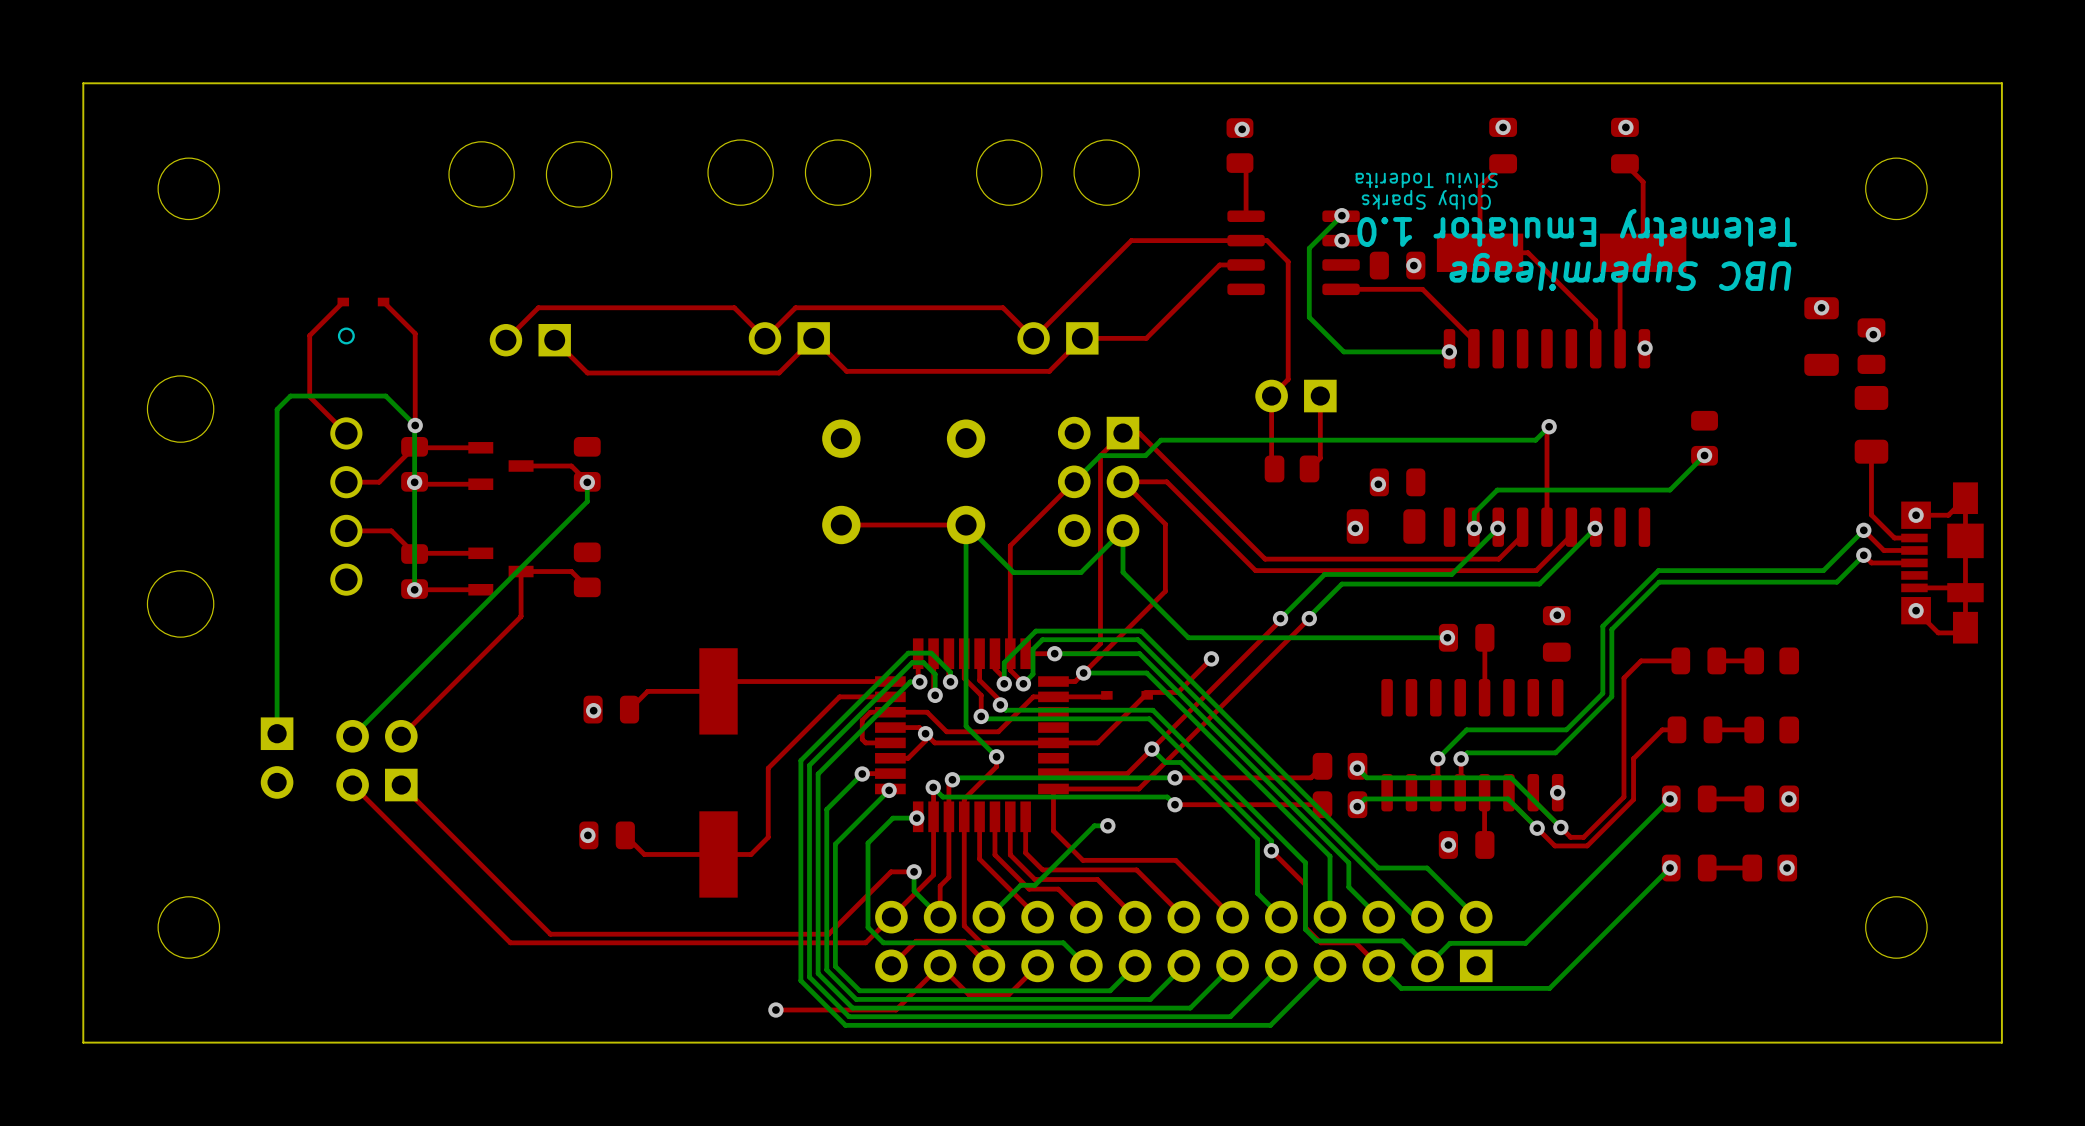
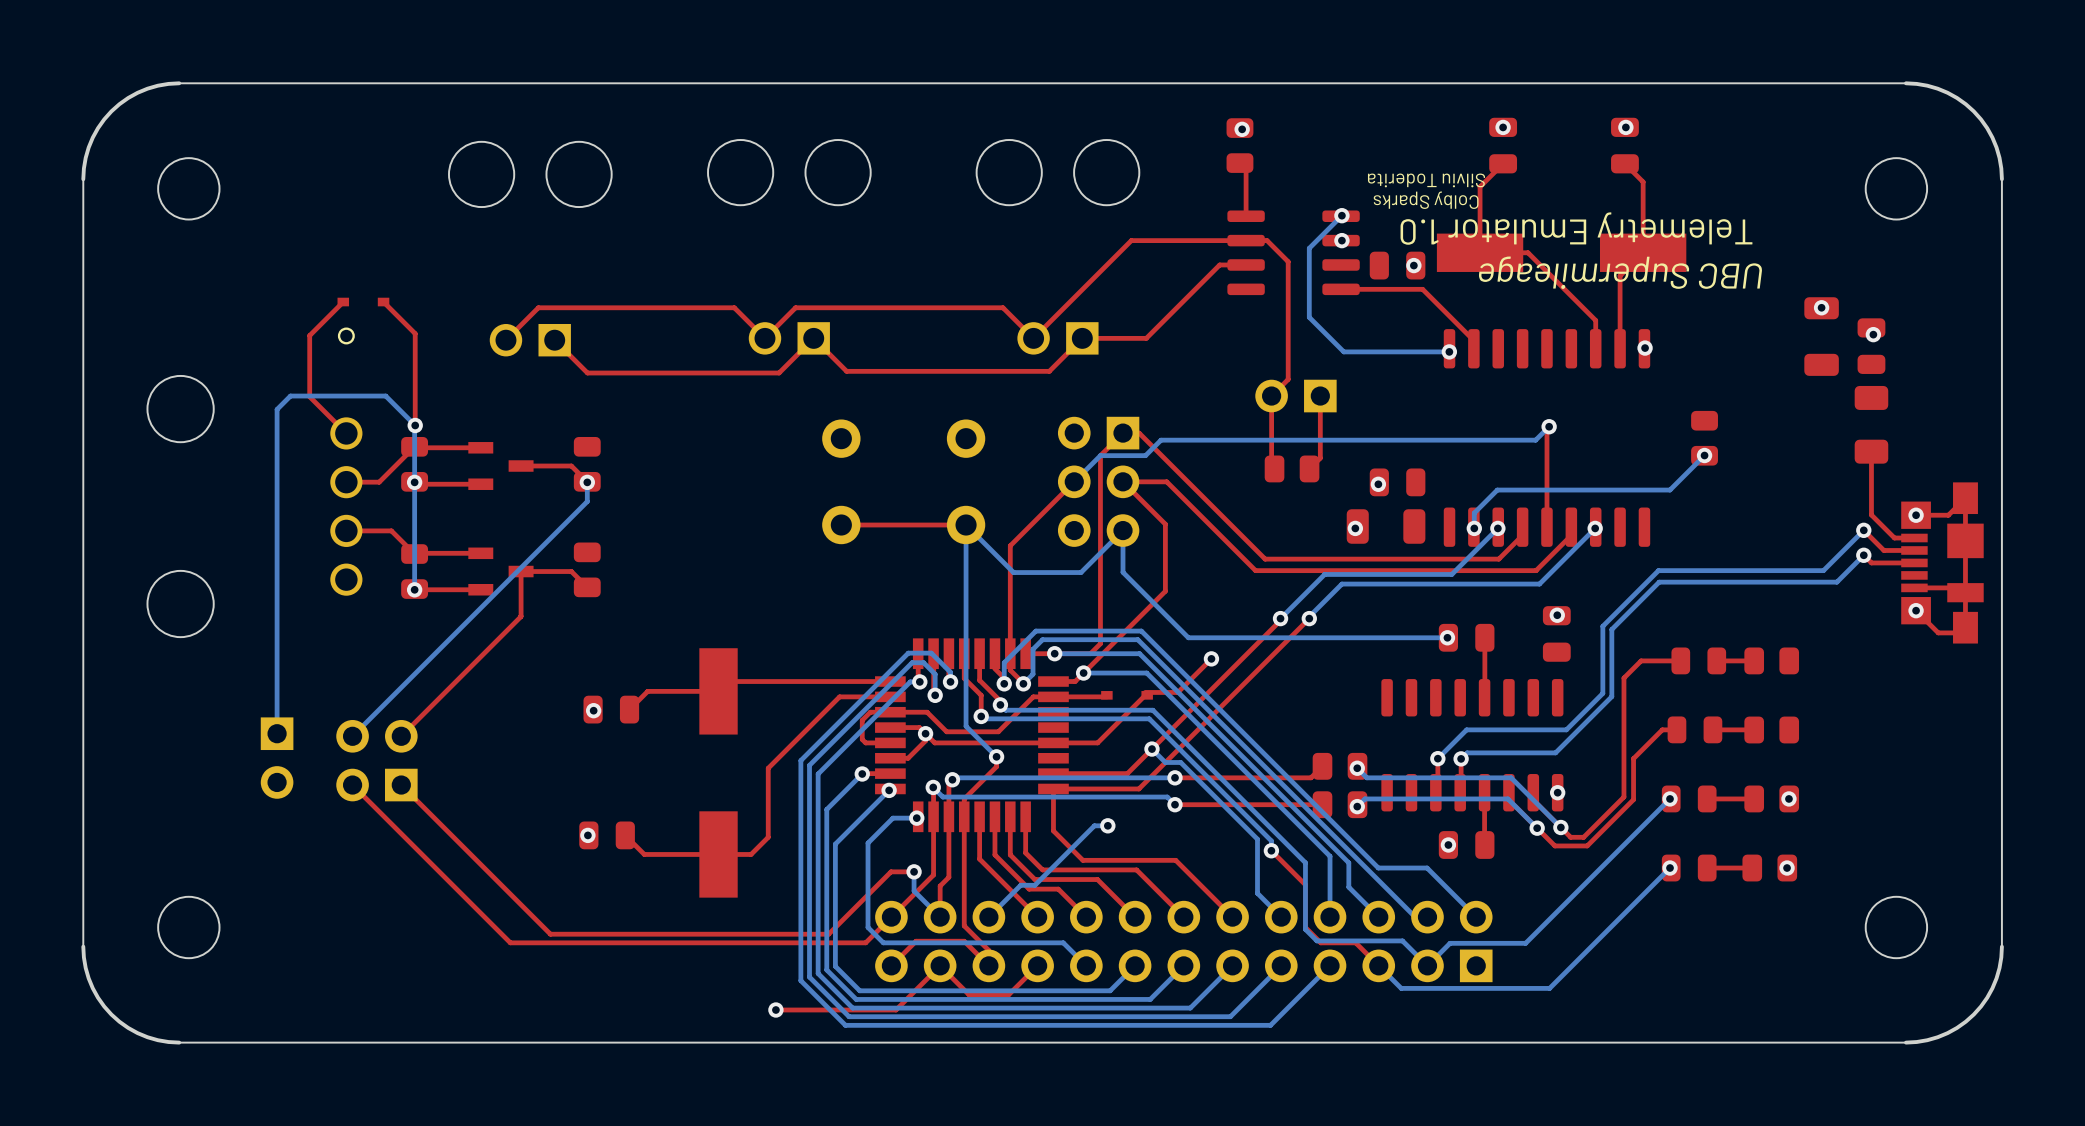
board edge: (179, 83) (83, 83) (83, 179) -> (179, 83) (157, 85) (137, 92) (111, 111) (92, 137) (85, 157) (83, 179)
board edge: (1906, 83) (2001, 83) (2001, 179) -> (1906, 83) (1937, 88) (1957, 98) (1973, 111) (1987, 128) (1996, 147) (2001, 179)
board edge: (83, 946) (83, 1042) (179, 1042) -> (83, 946) (88, 978) (98, 997) (111, 1014) (128, 1027) (147, 1037) (179, 1042)
board edge: (2001, 946) (2001, 1042) (1906, 1042) -> (2001, 946) (1999, 968) (1992, 988) (1973, 1014) (1947, 1033) (1927, 1040) (1906, 1042)

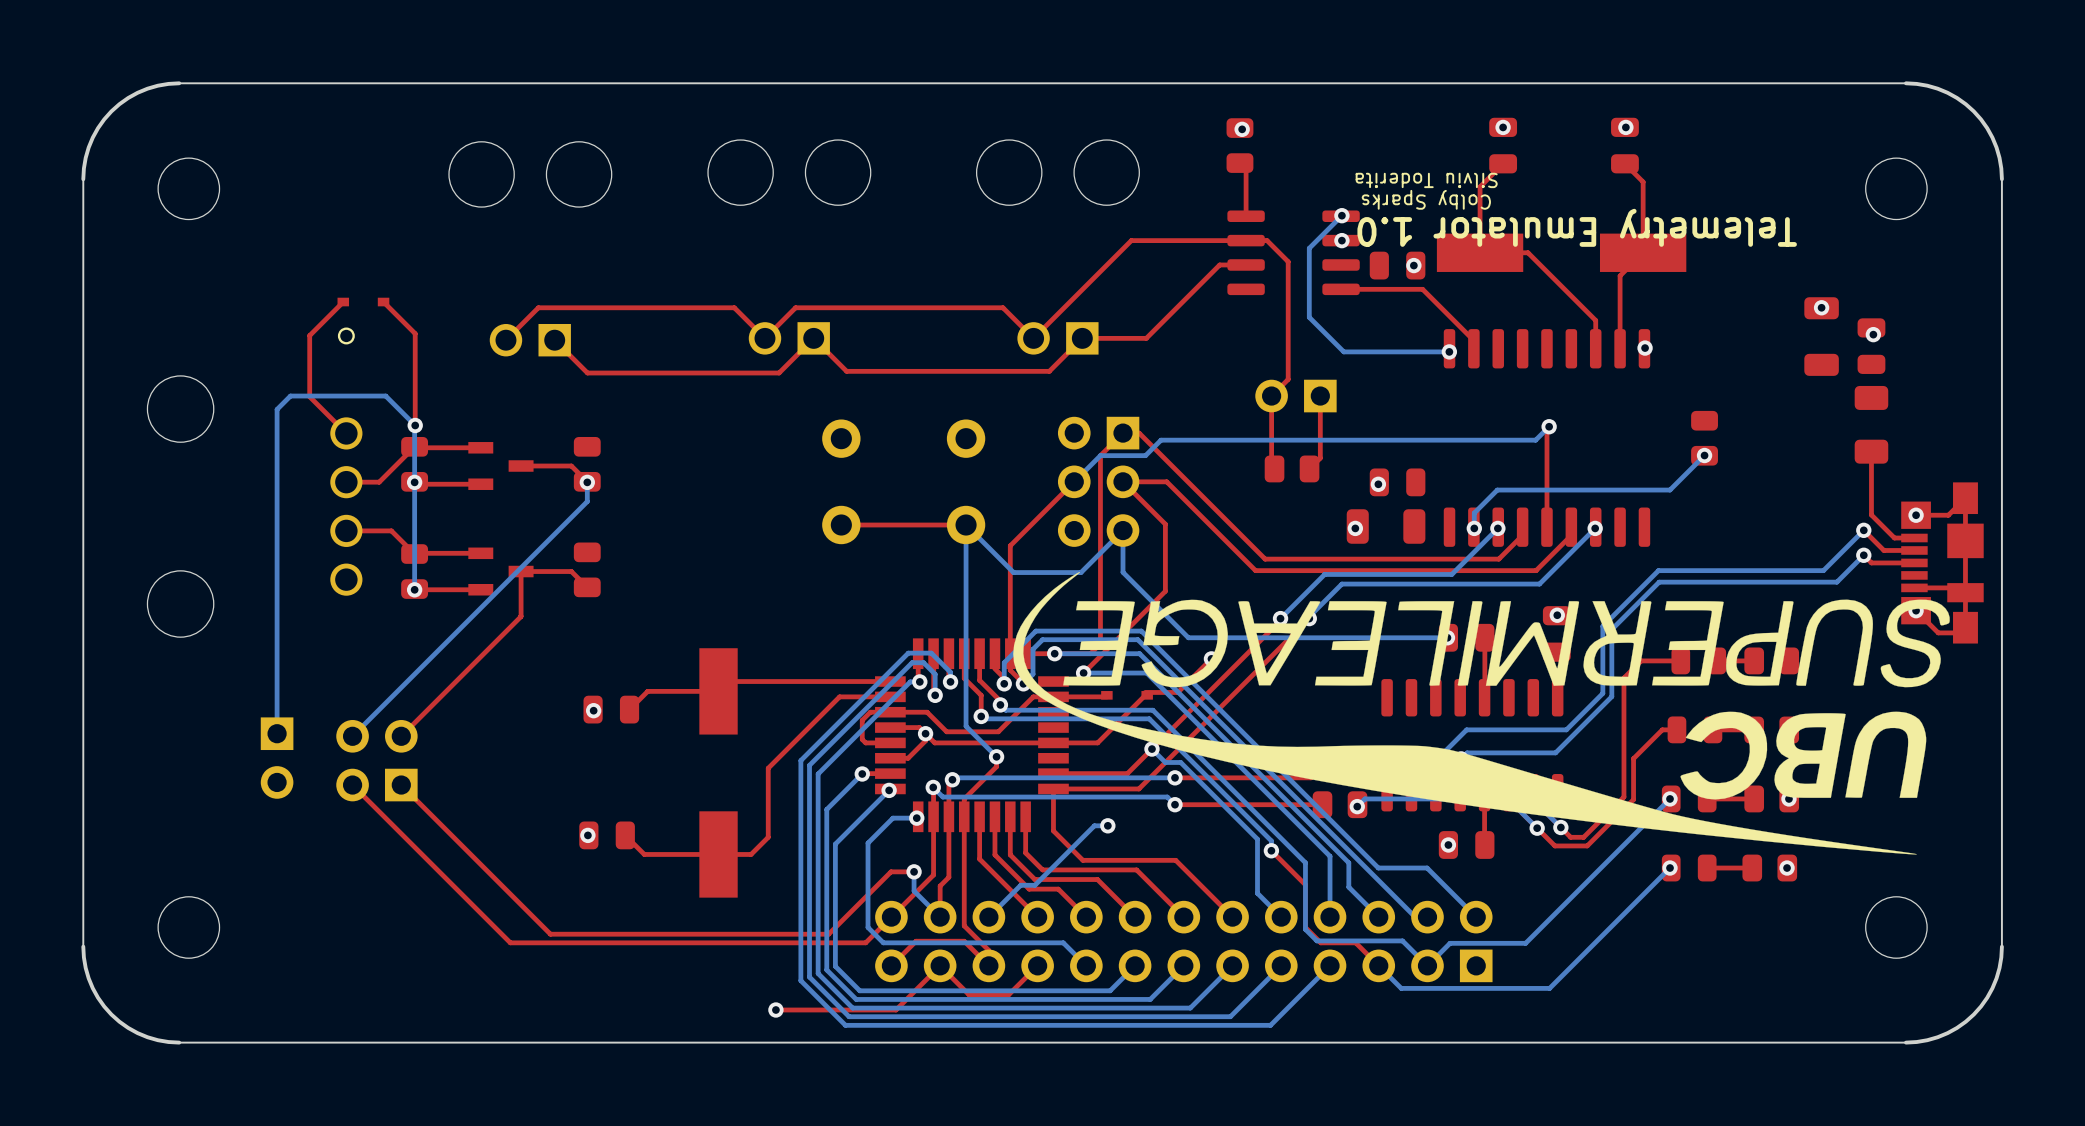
text: UBC Supermileage (1620, 272) -> none
drawing: none -> [1013, 572, 1950, 855]

